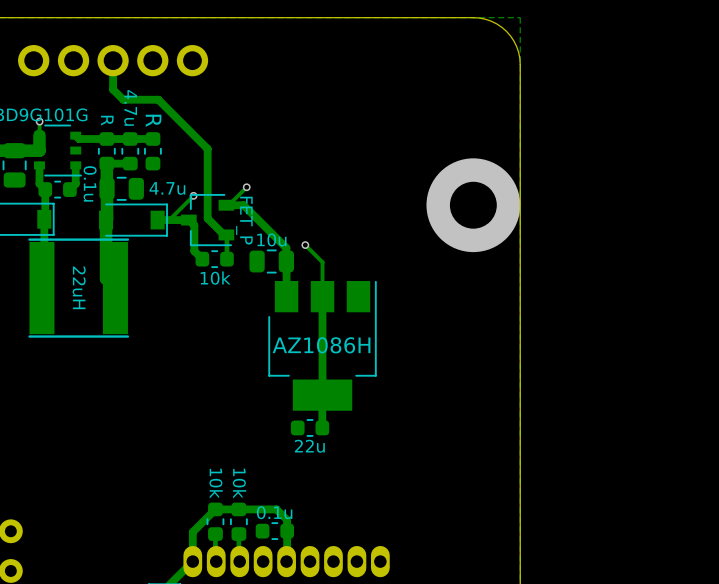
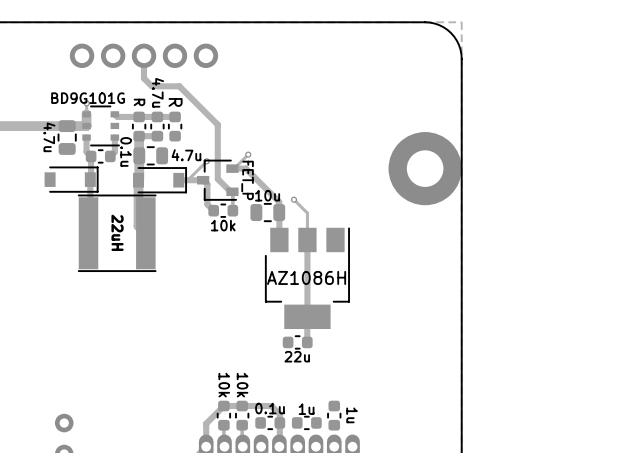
part: none -> 1u (334, 415)
part: none -> 1u (306, 422)

